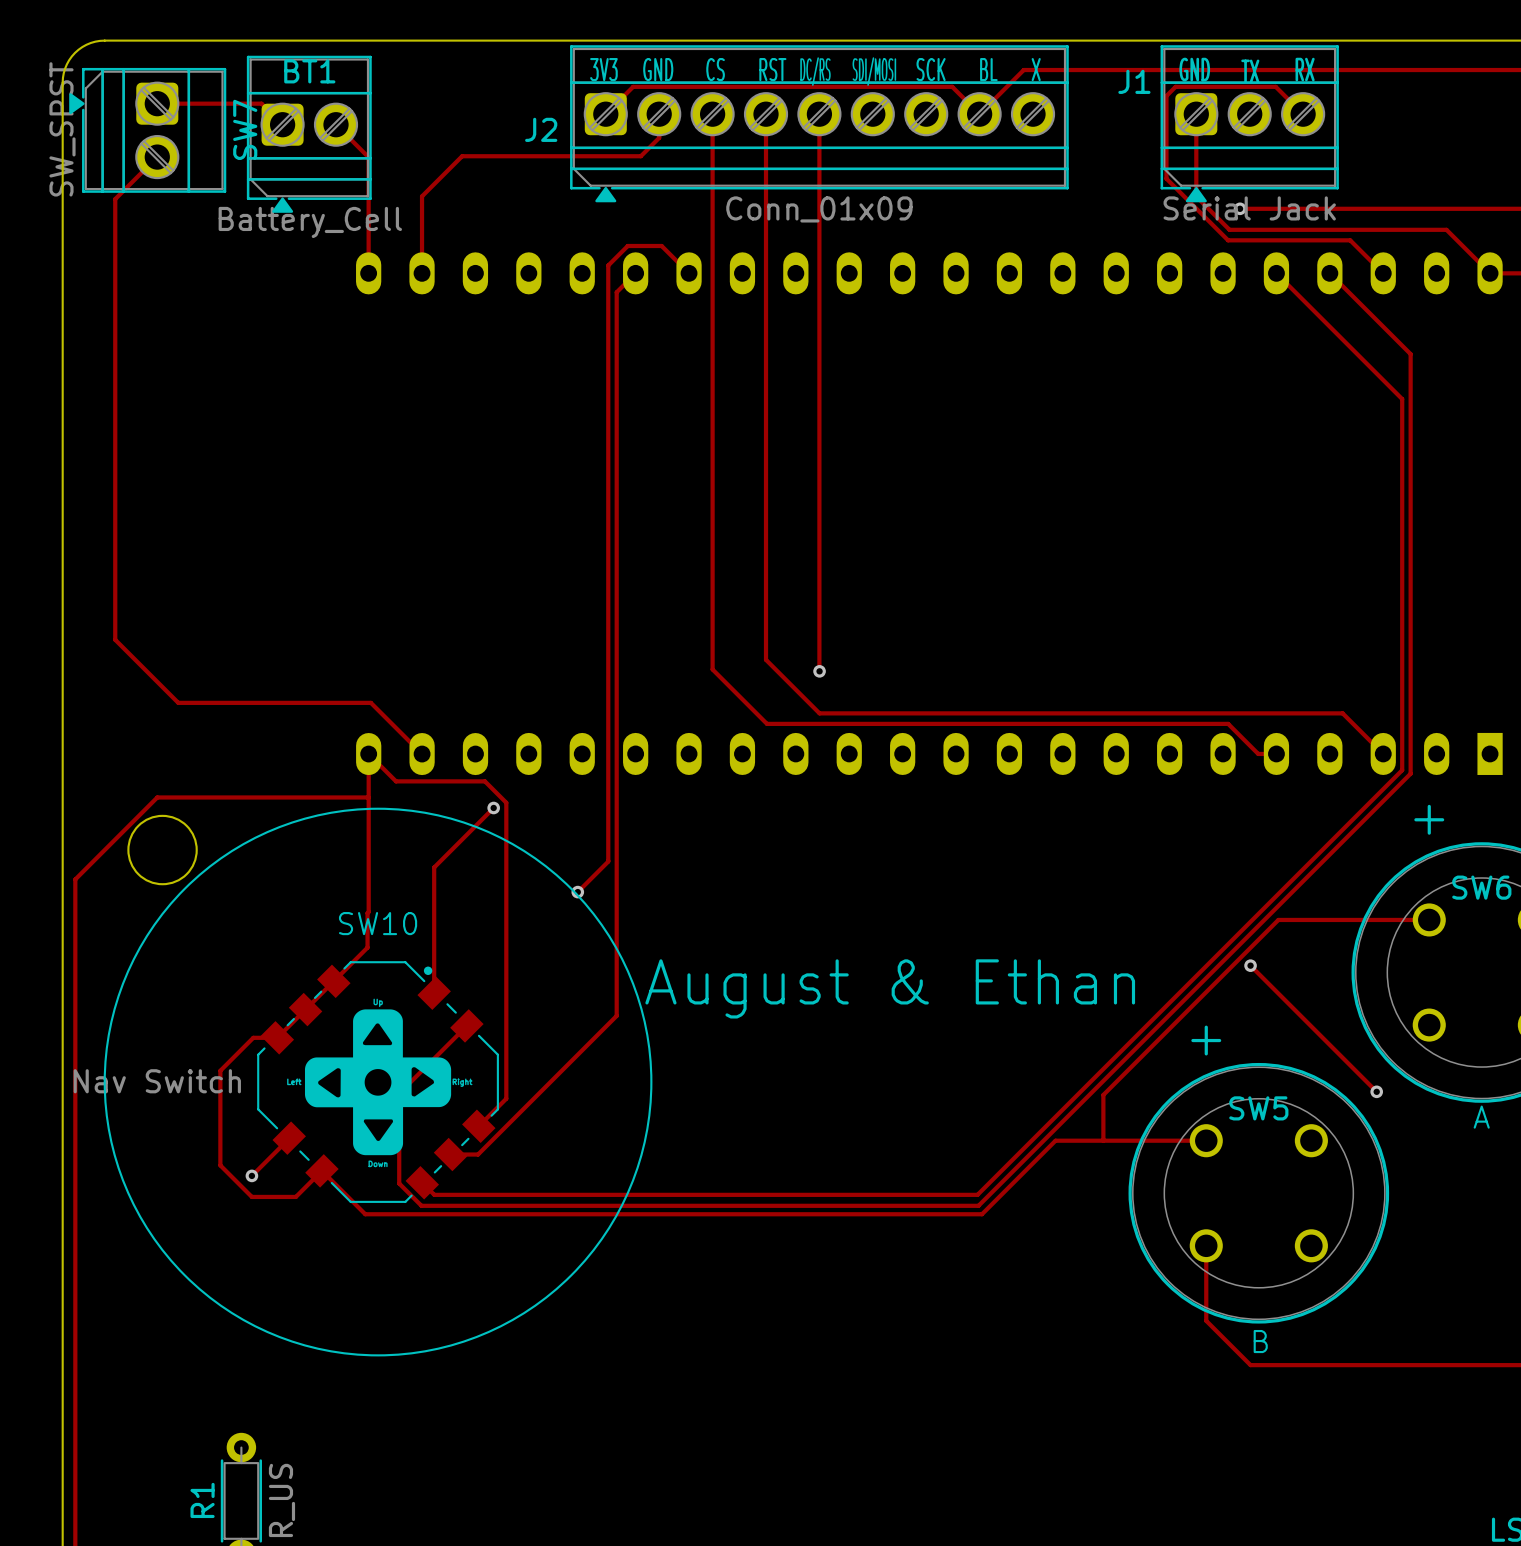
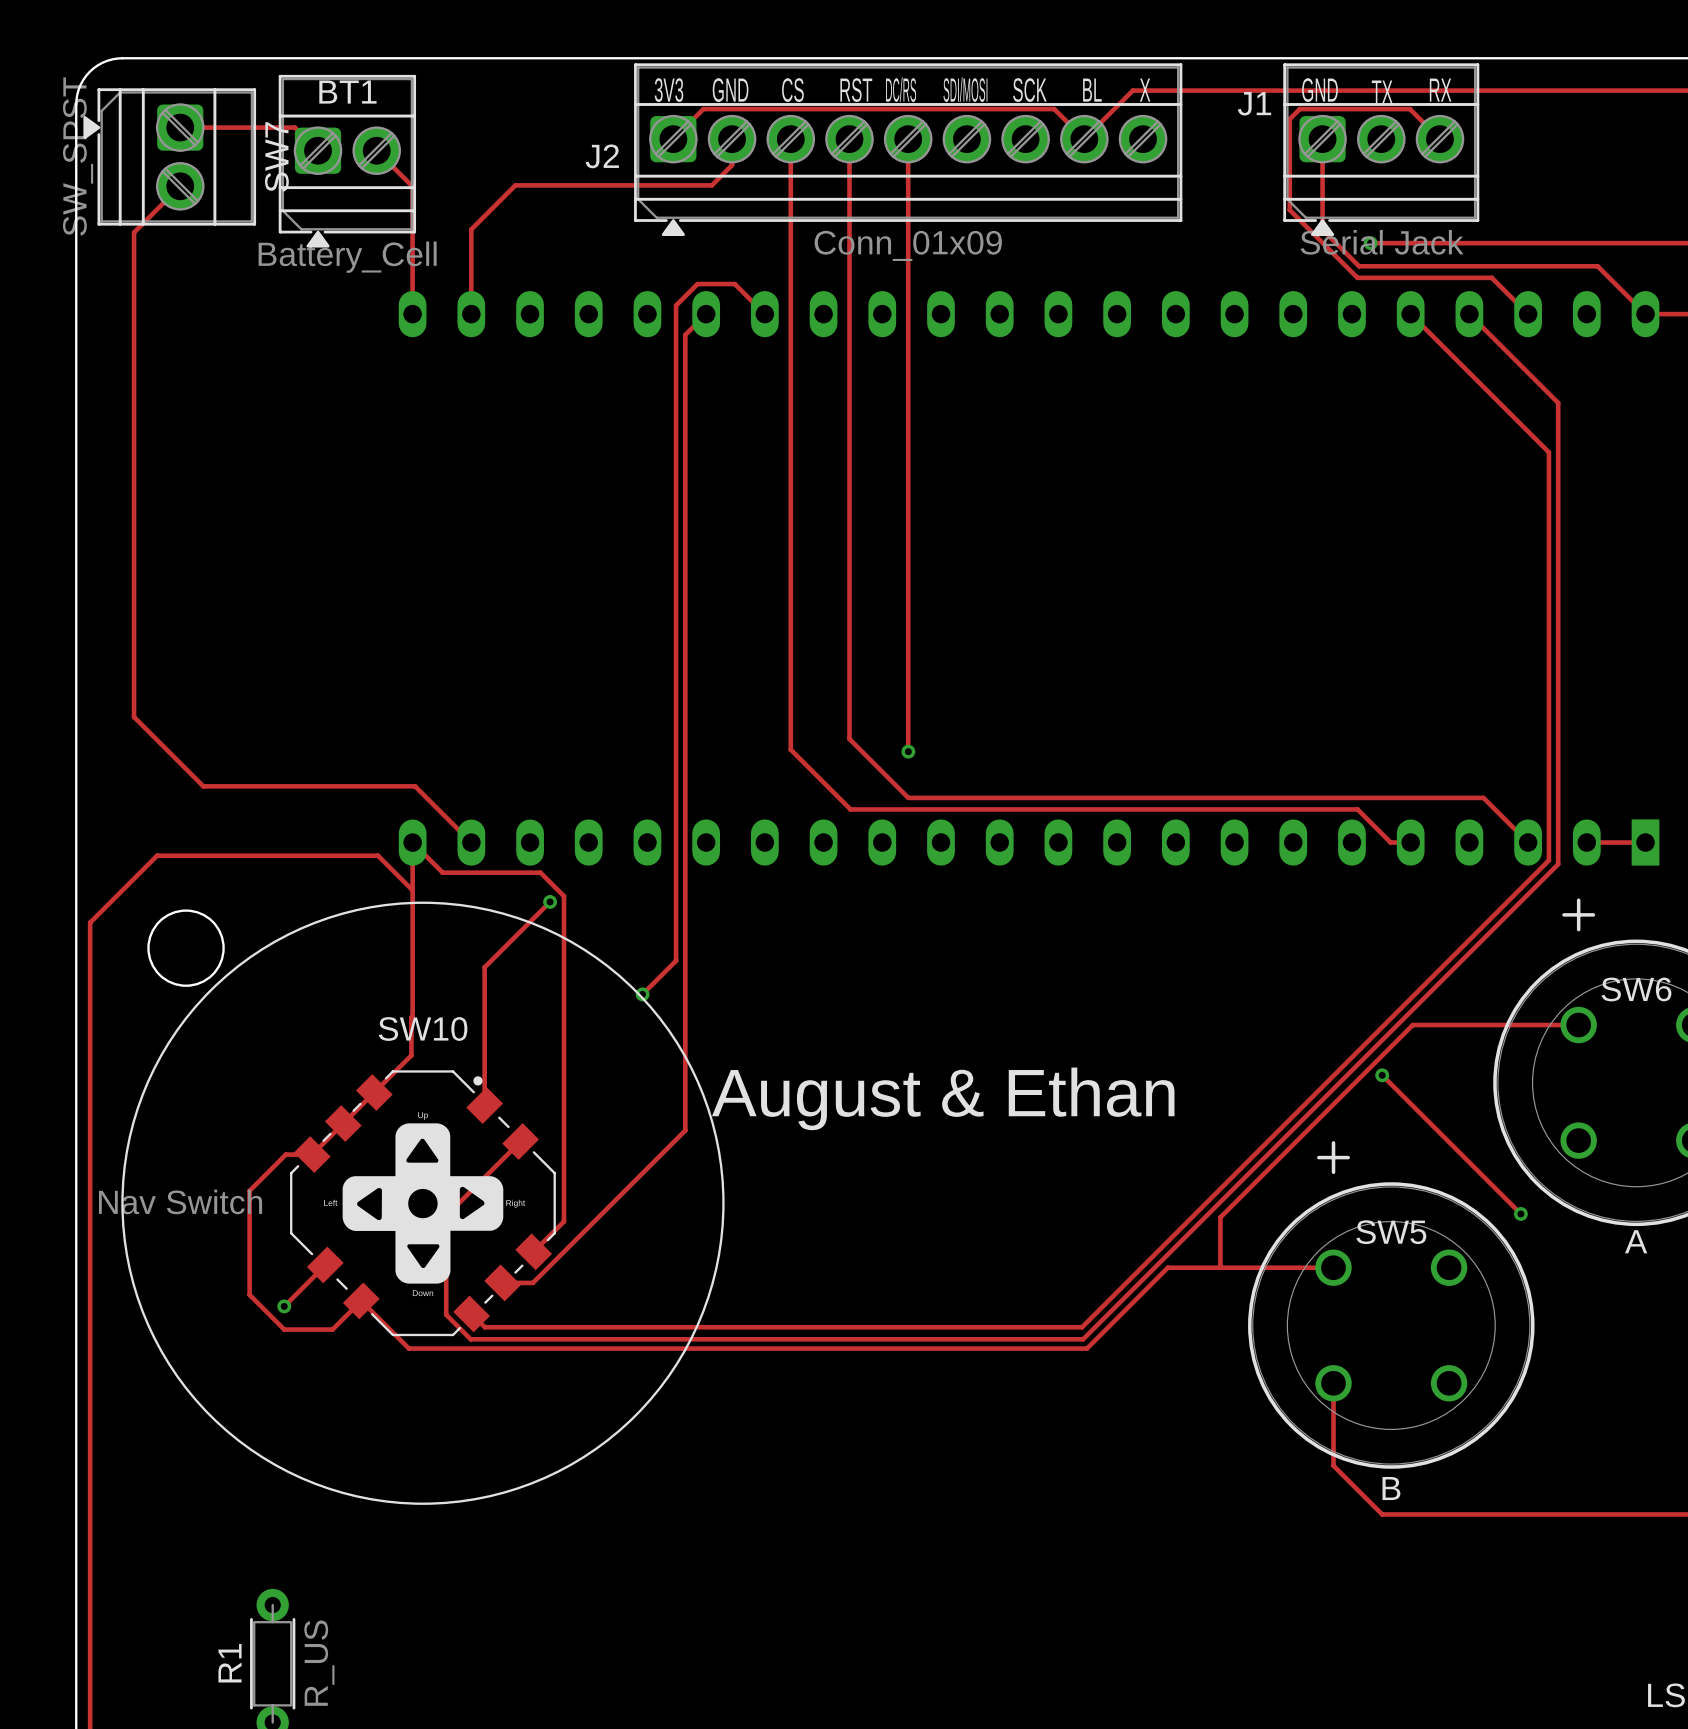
track: none -> (1586, 842) (1645, 842)
track: (368, 797) (157, 797) (75, 879) -> (412, 890) (377, 855) (157, 855) (90, 922) (90, 980)

